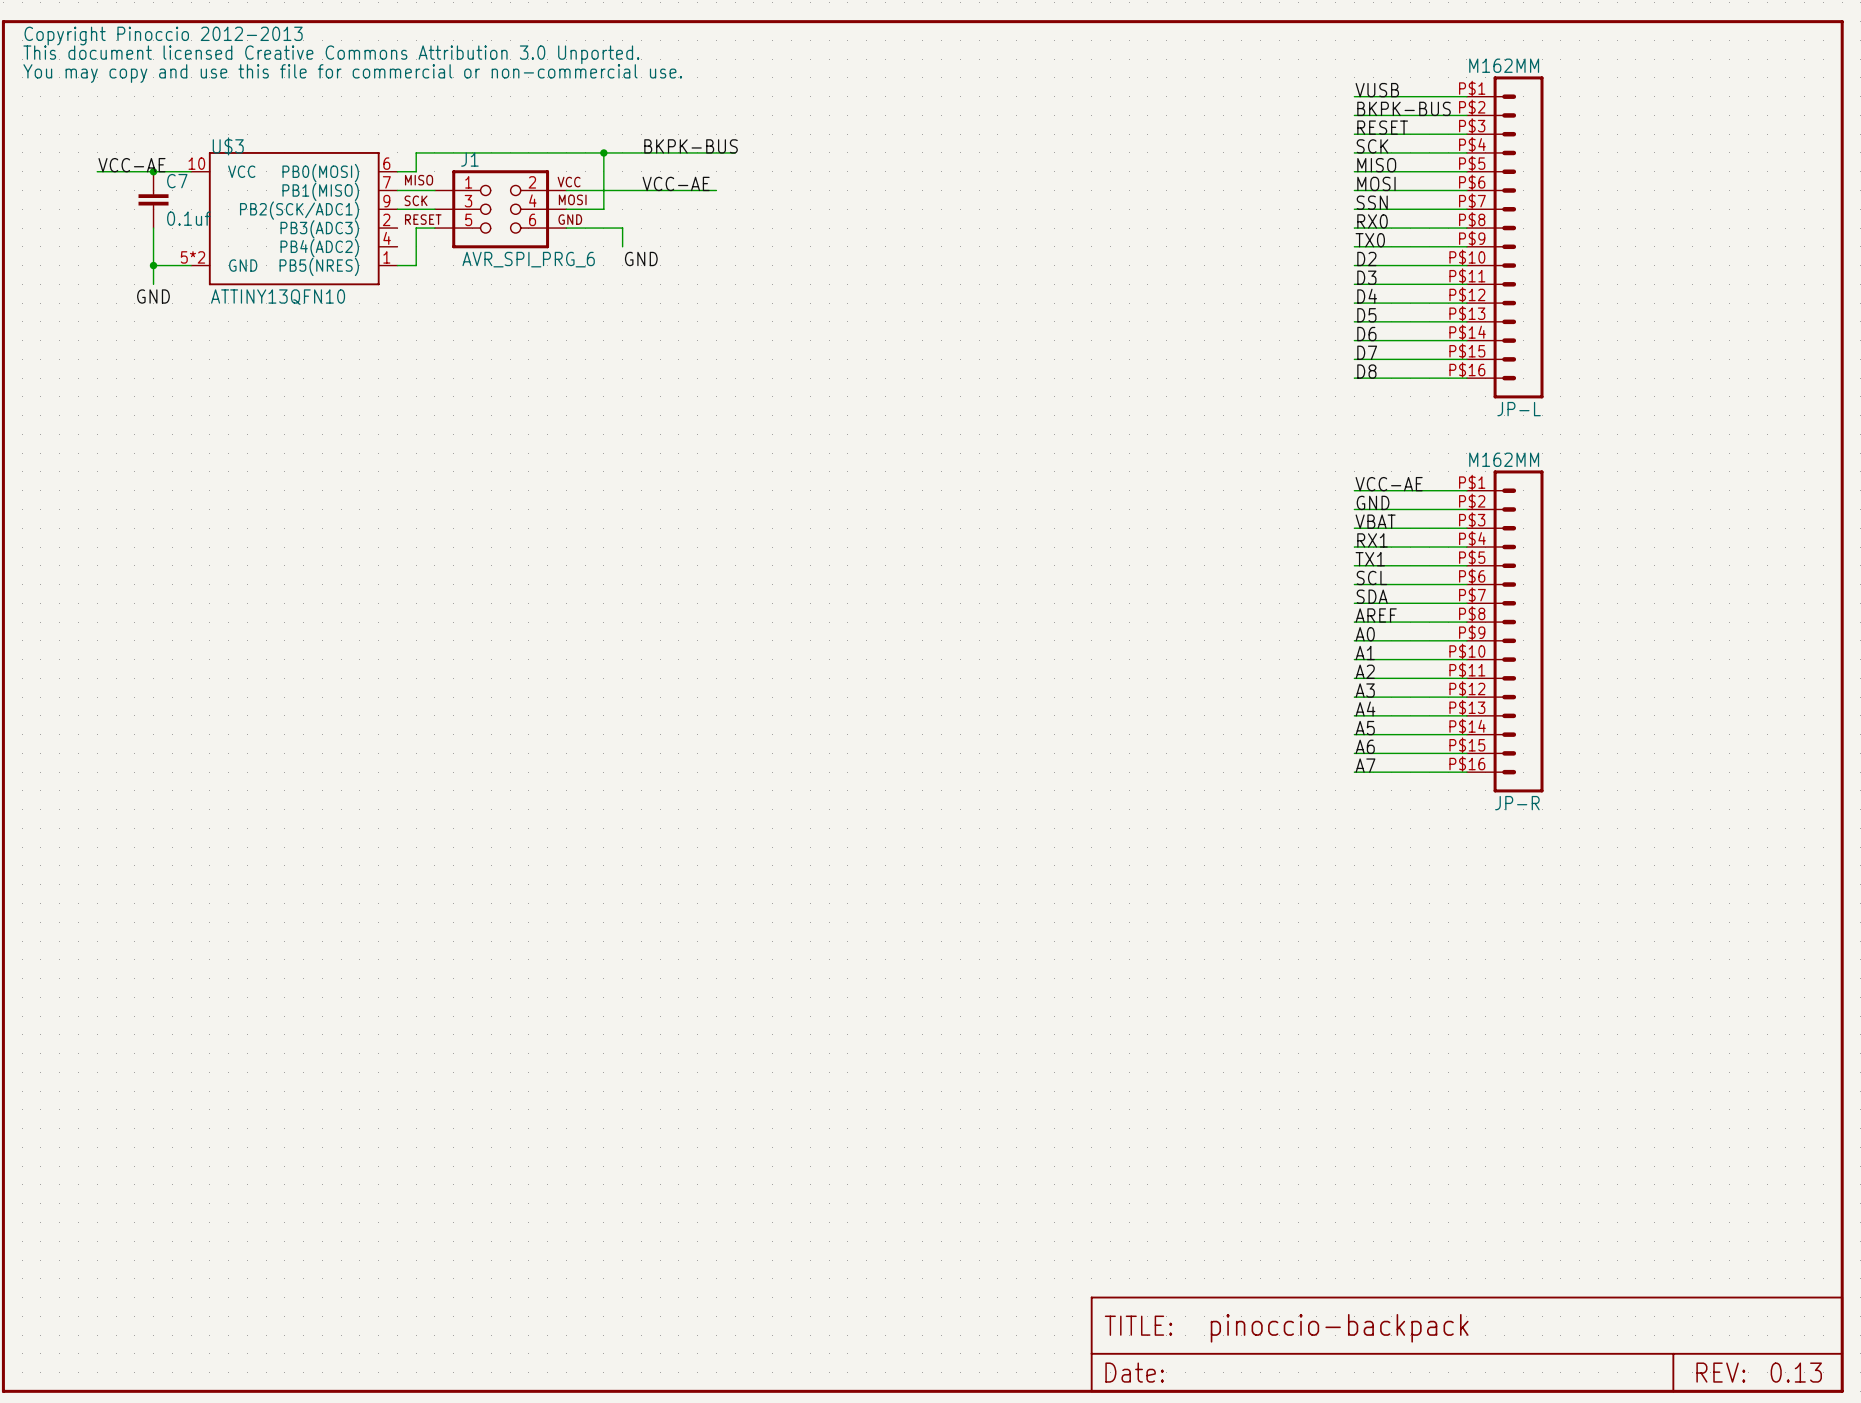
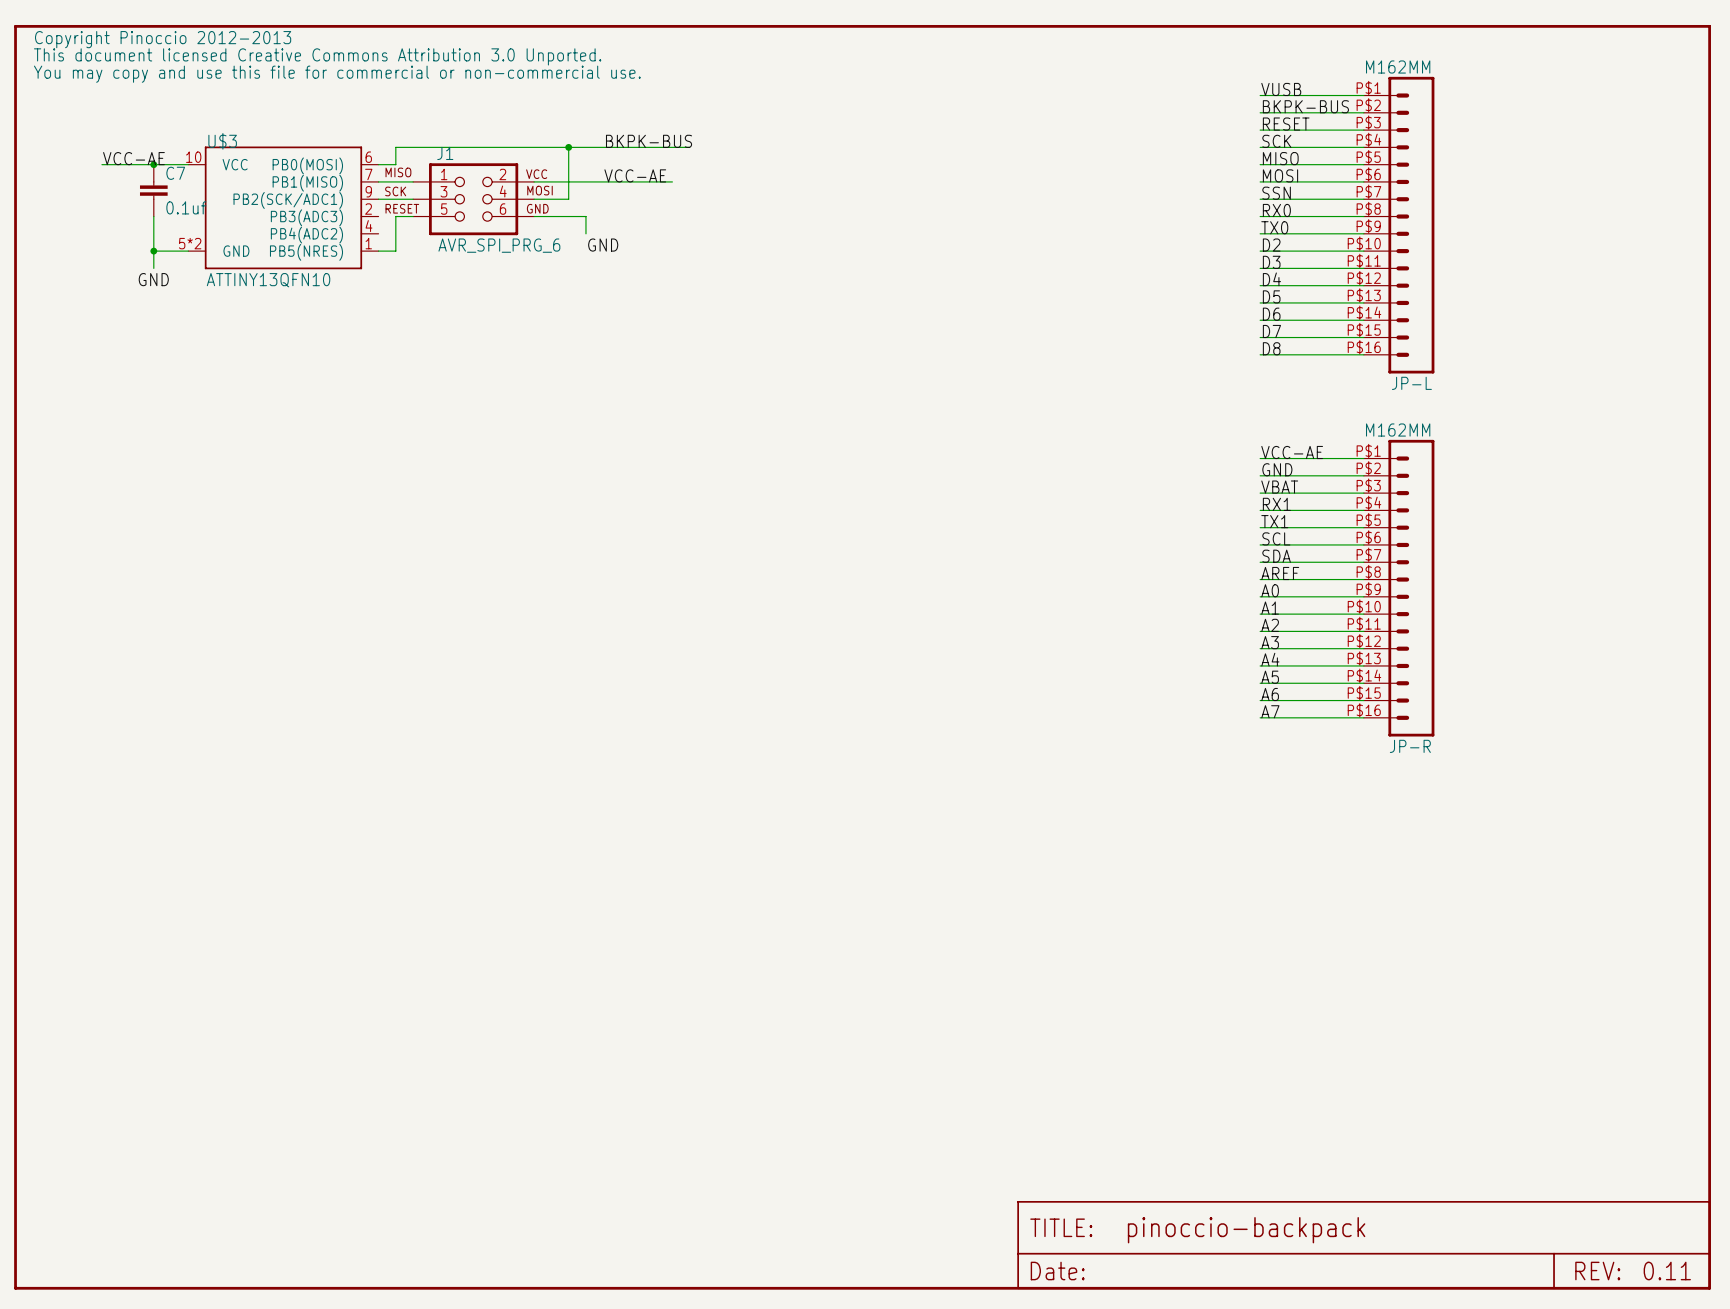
text: 0.13 (1796, 1372) -> 0.11 (1667, 1271)

